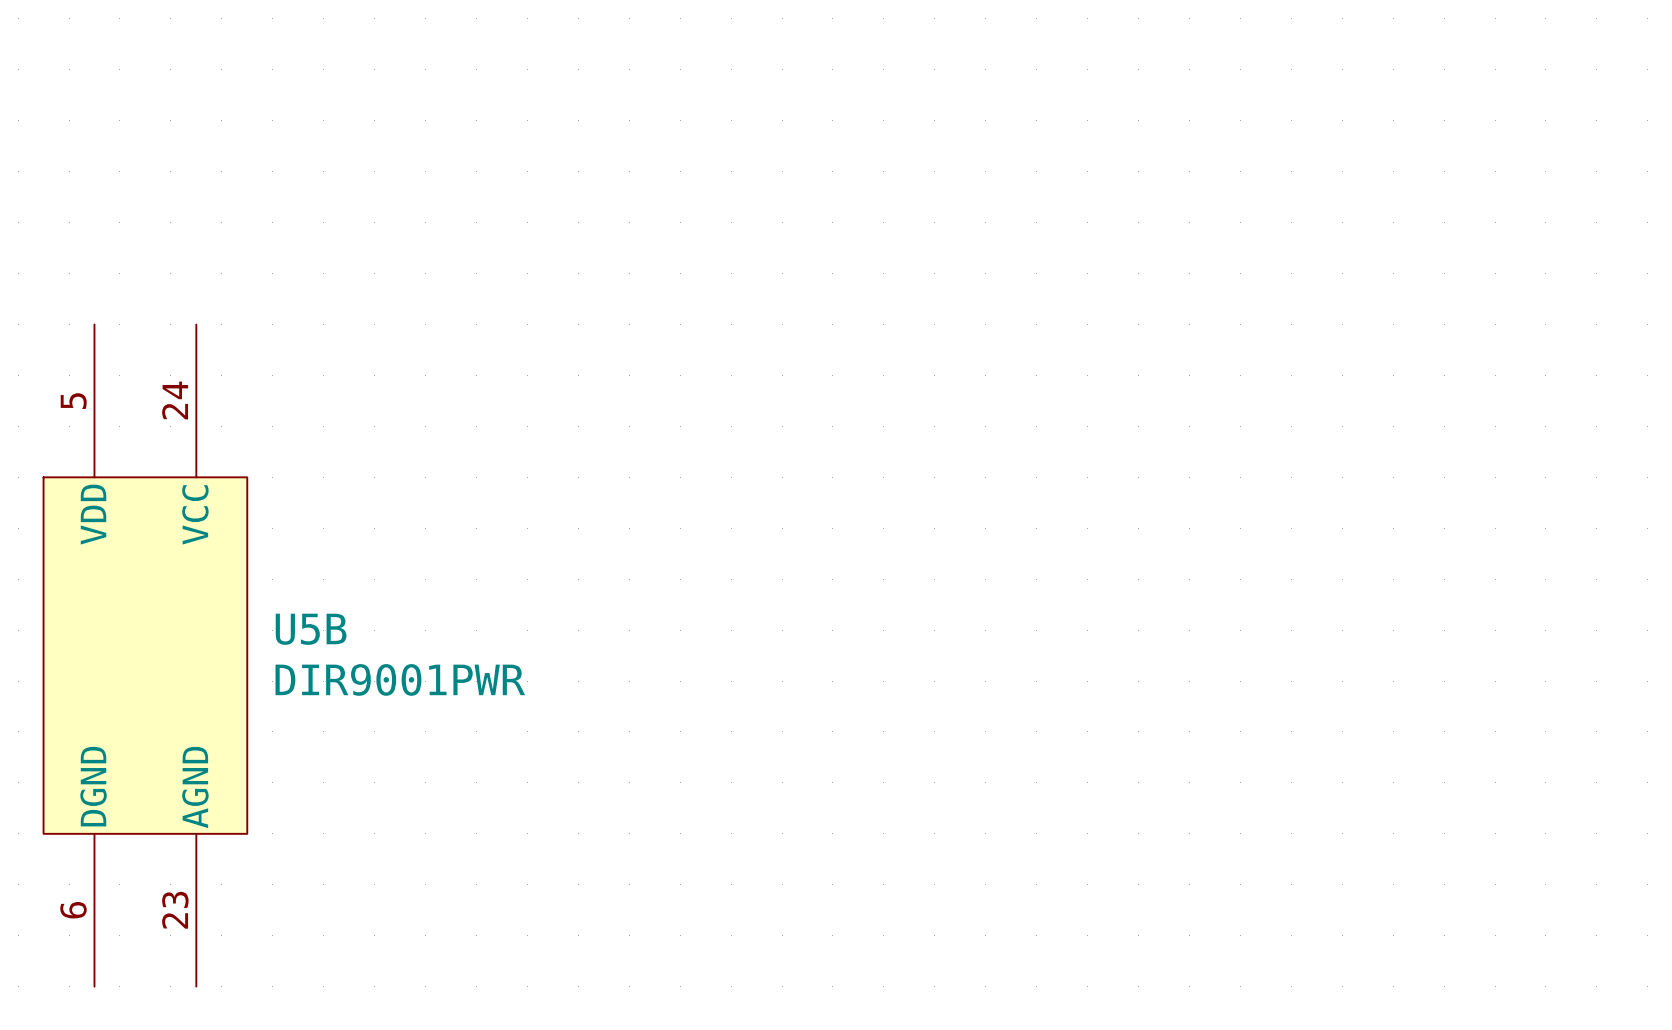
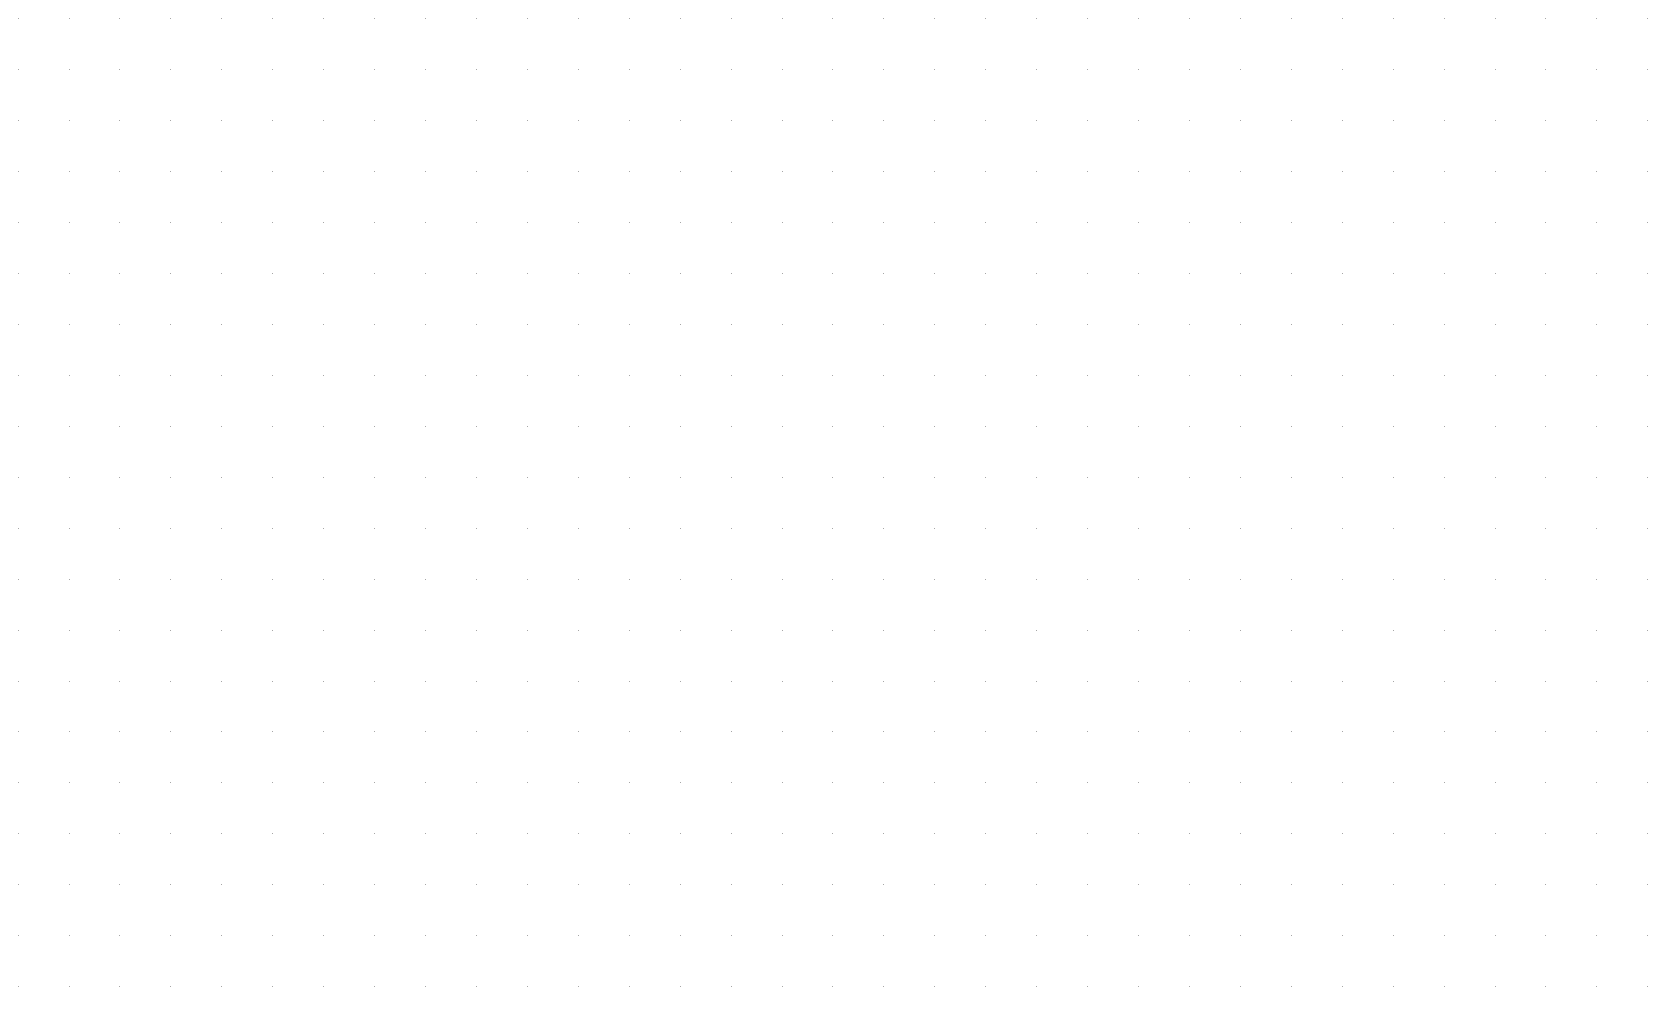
U5B: DIR9001PWR (145, 655) -> none

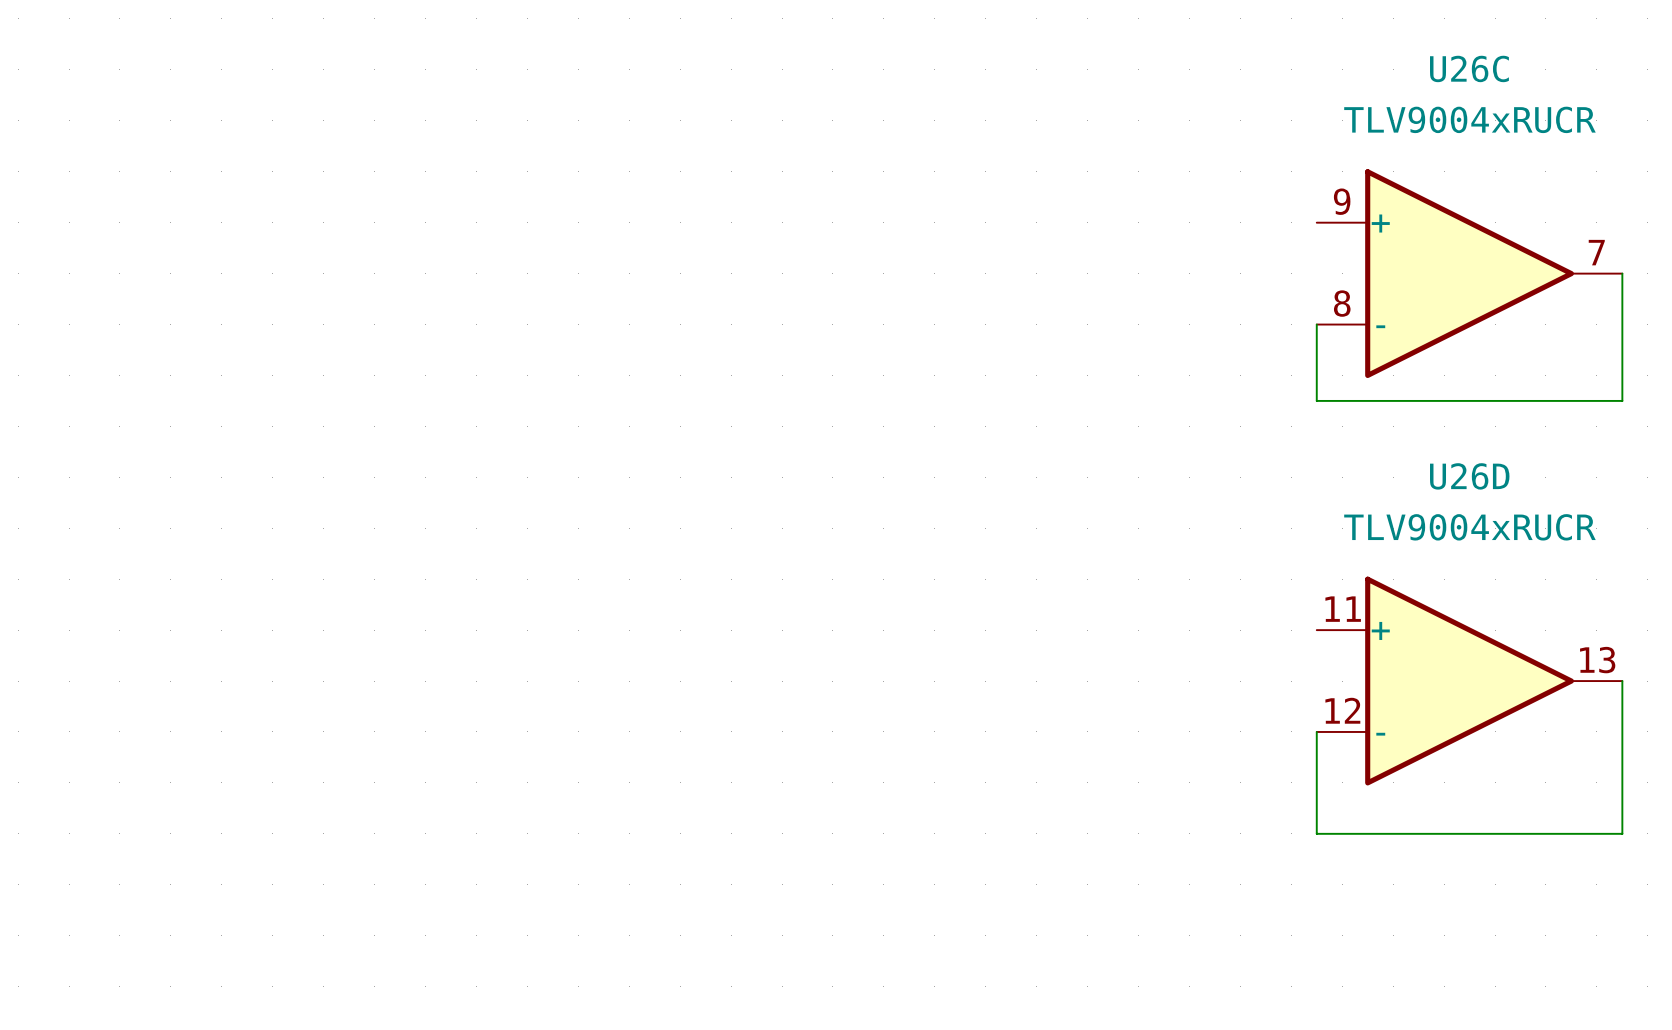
U26C: none -> TLV9004xRUCR (1469, 273)
wire: none -> (1622, 273) (1622, 400) (1316, 400) (1316, 324)
U26D: none -> TLV9004xRUCR (1469, 681)
wire: none -> (1622, 681) (1622, 833) (1316, 833) (1316, 731)

